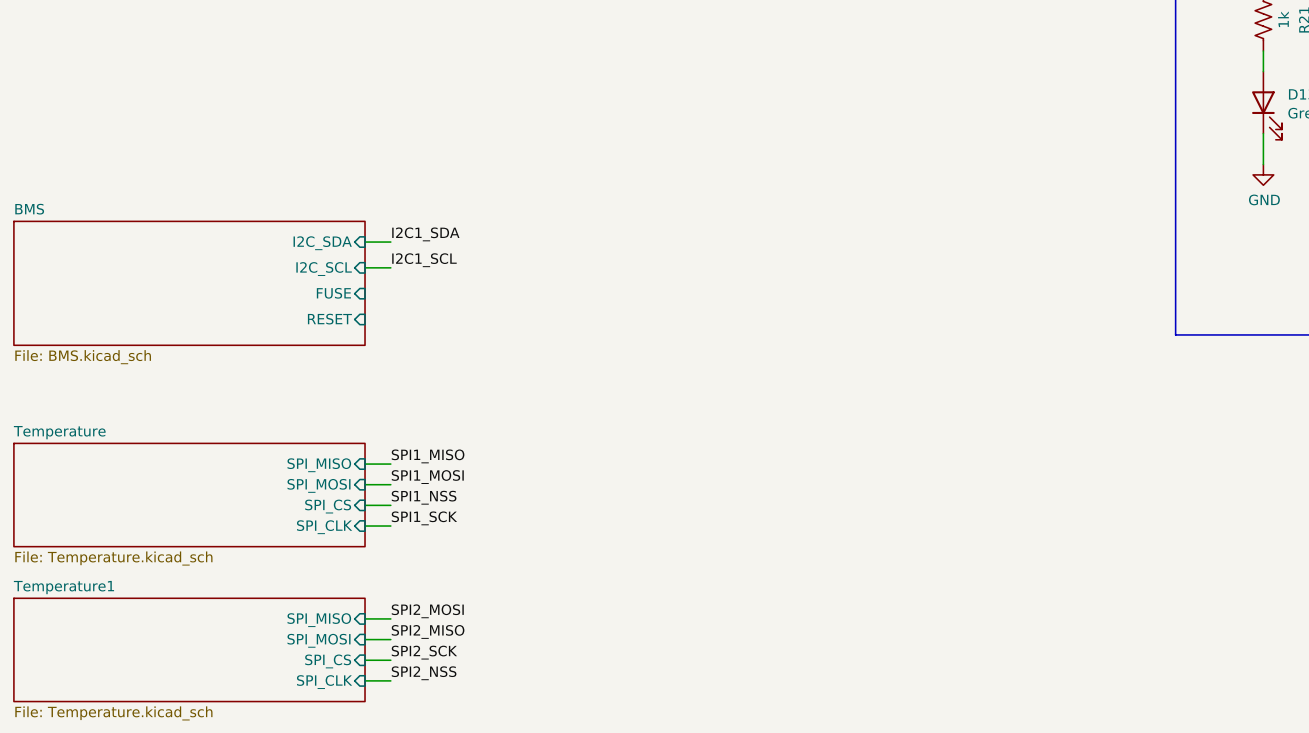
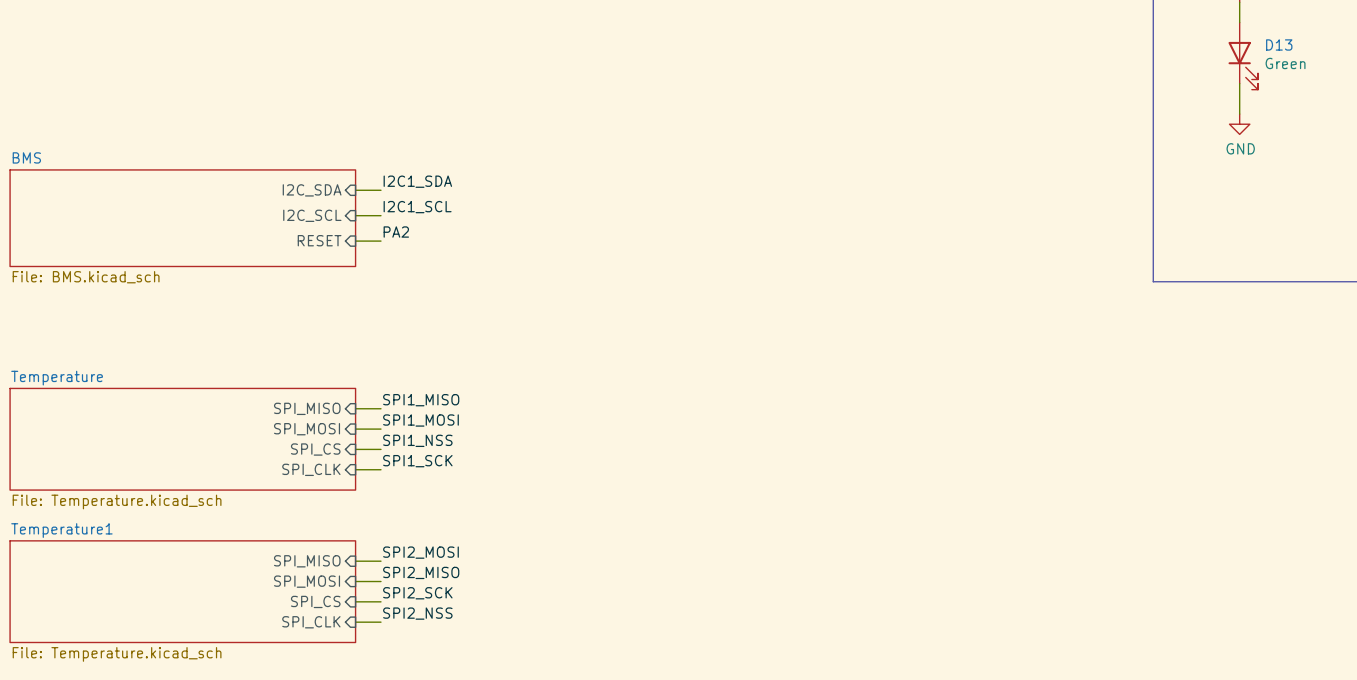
sheet BMS: none -> File: BMS.kicad_sch (182, 218)
sheet BMS: File: BMS.kicad_sch (189, 283) -> none
label: none -> PA2 (396, 232)
sheet pin: FUSE (333, 293) -> RESET (319, 240)
wire: none -> (355, 241) (380, 241)
sheet pin: RESET (329, 319) -> none

